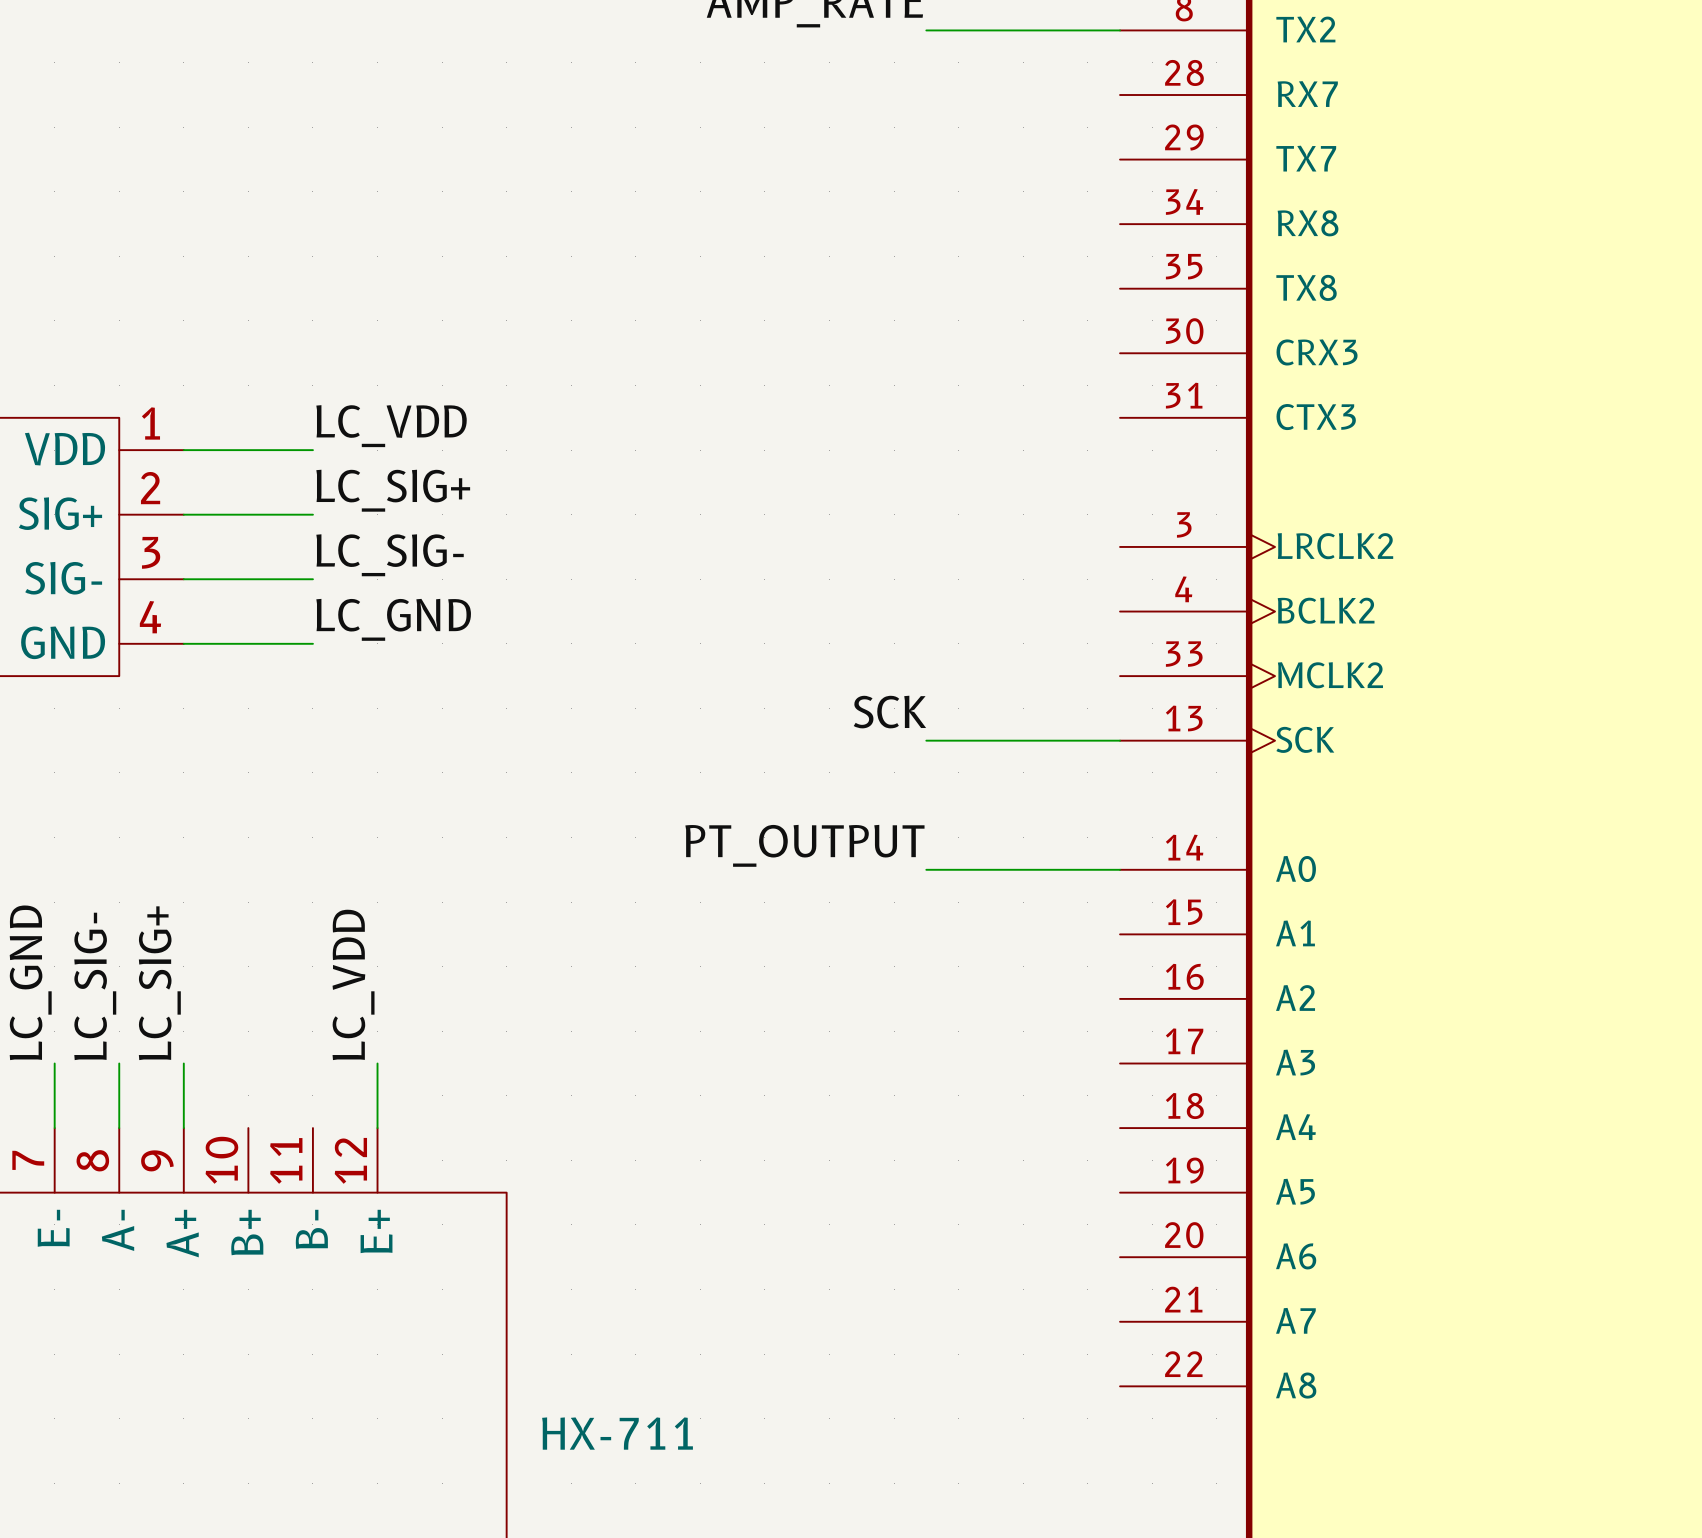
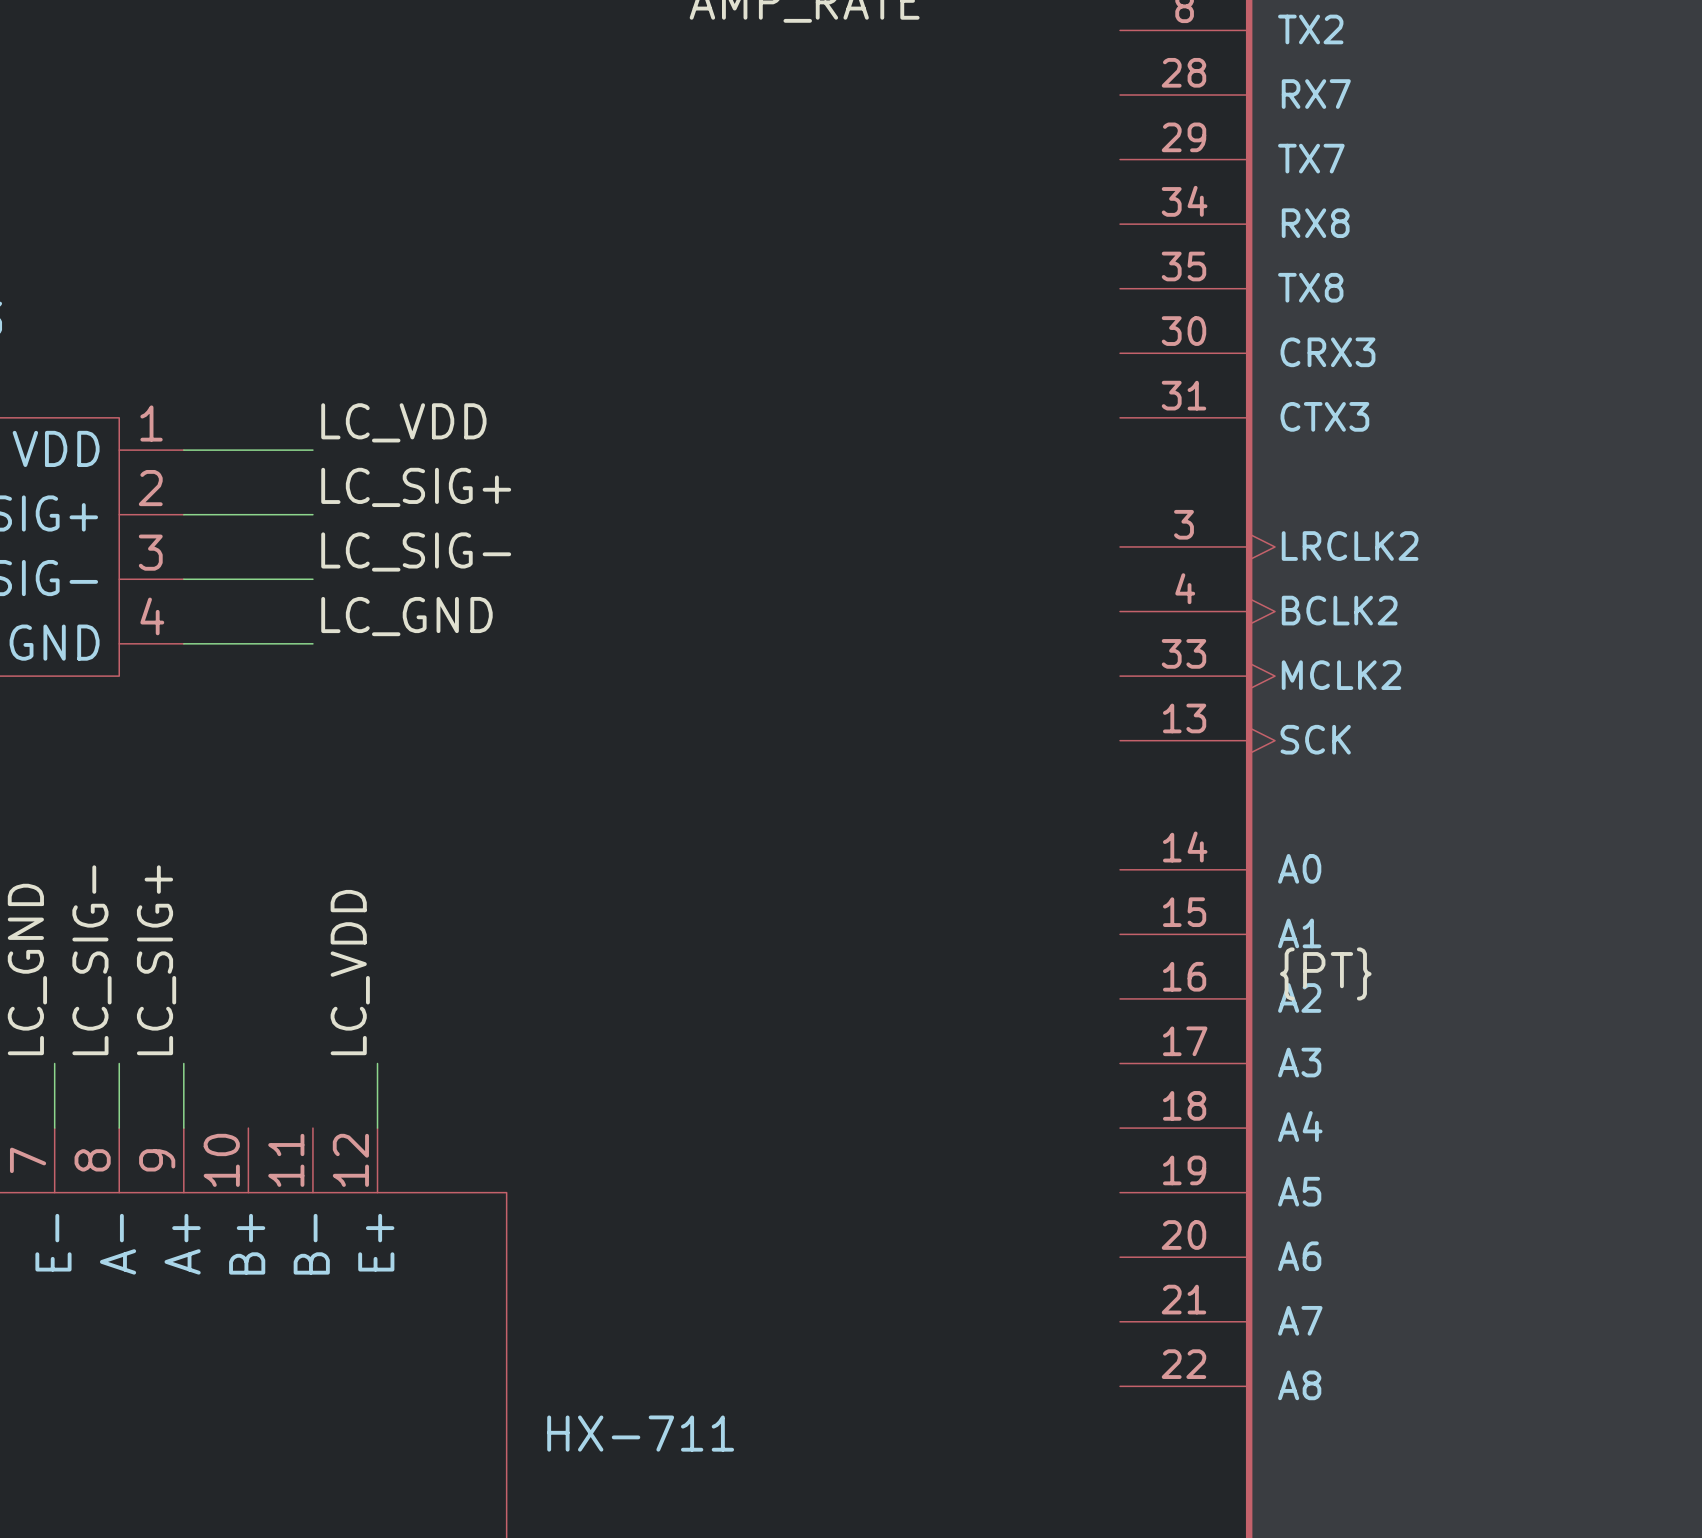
wire: (926, 30) (1120, 30) -> none
label: SCK (889, 712) -> none
wire: (926, 740) (1120, 740) -> none
label: PT_OUTPUT (804, 845) -> none
wire: (926, 869) (1120, 869) -> none
label: none -> {PT} (1325, 973)

